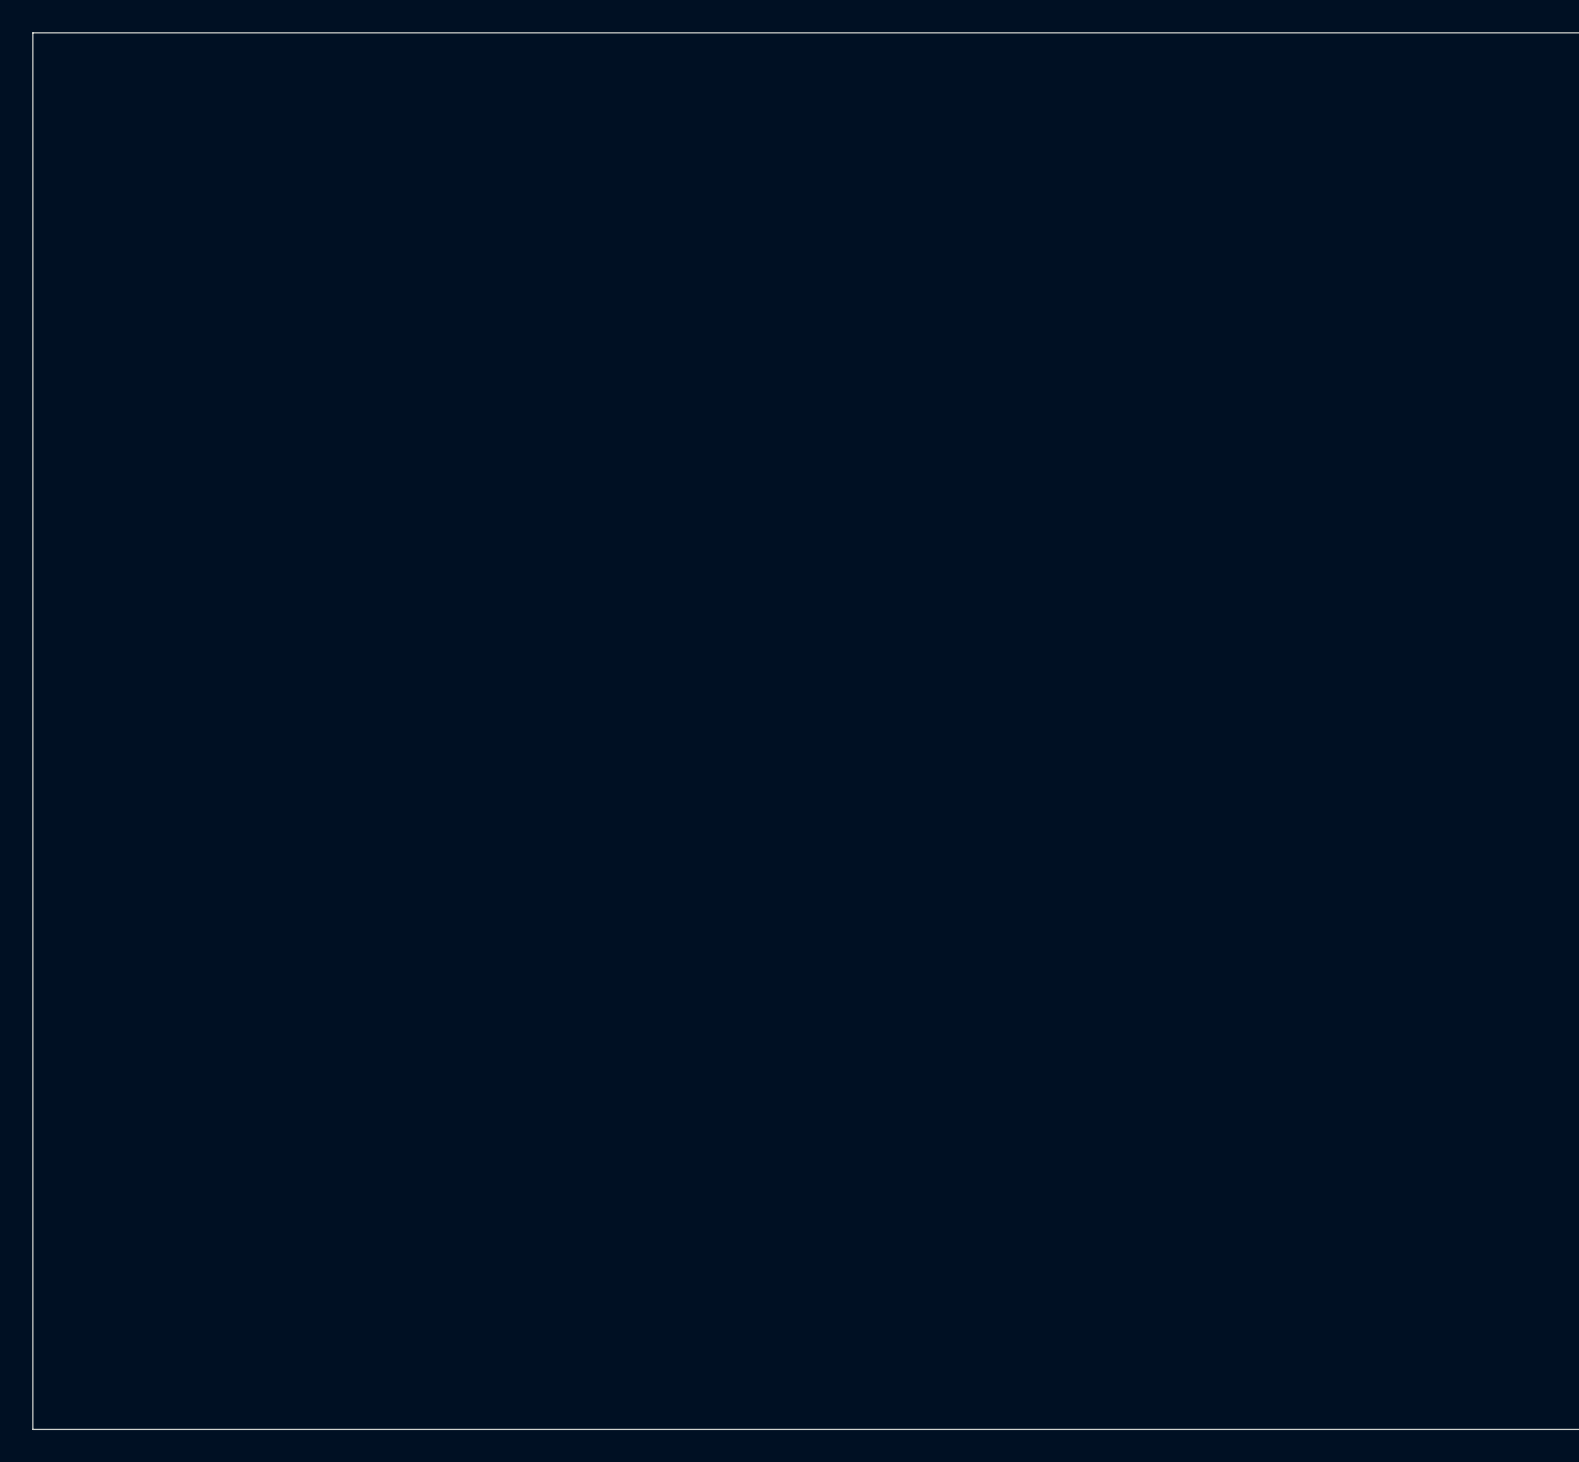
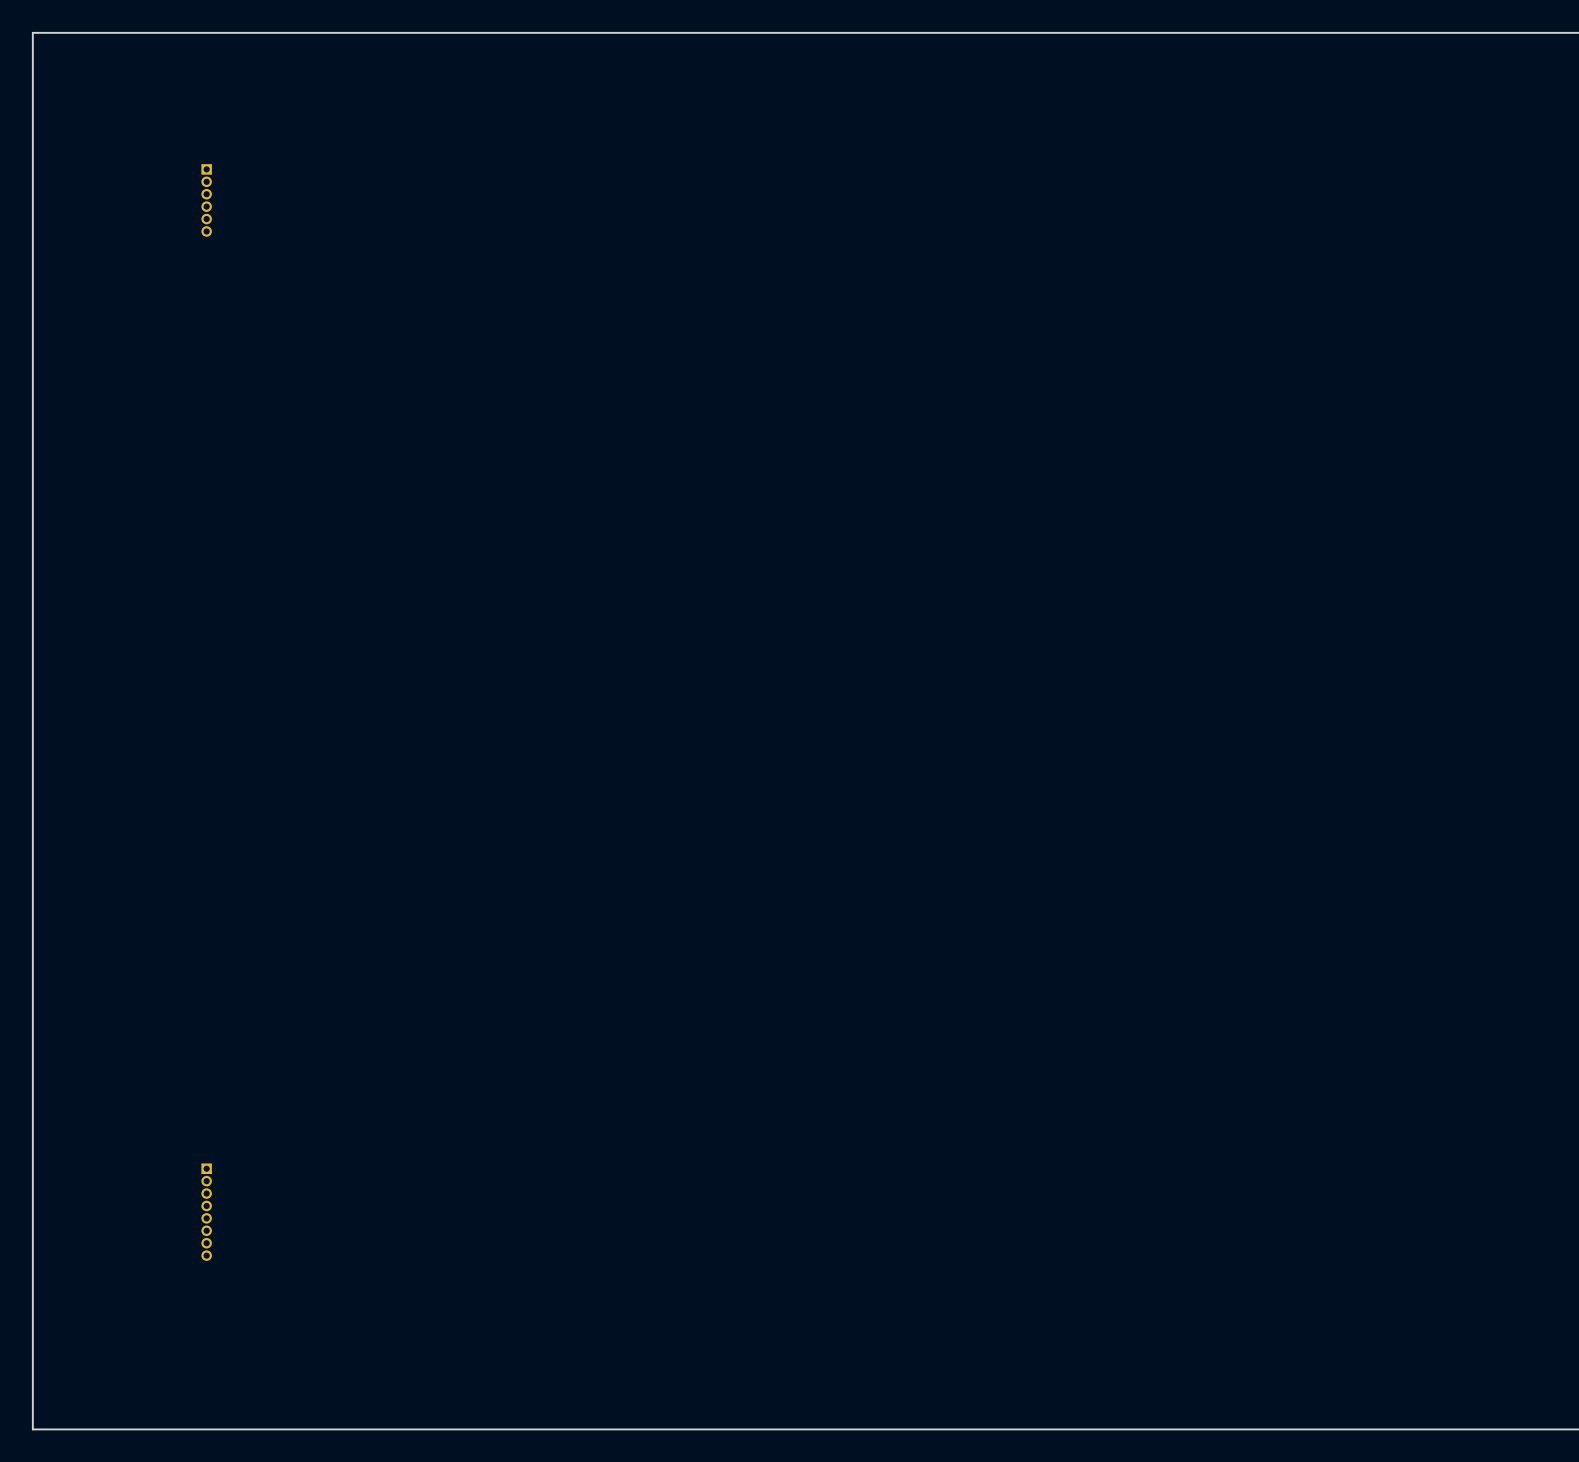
part: none -> (206, 200)
part: none -> (206, 1212)

